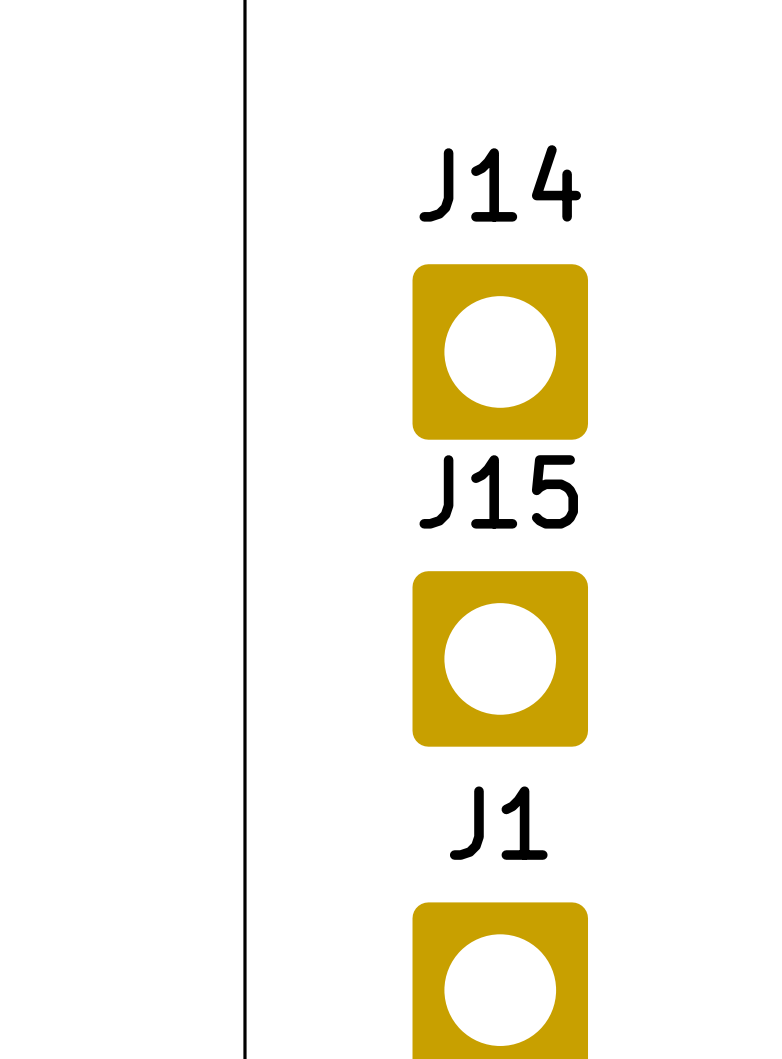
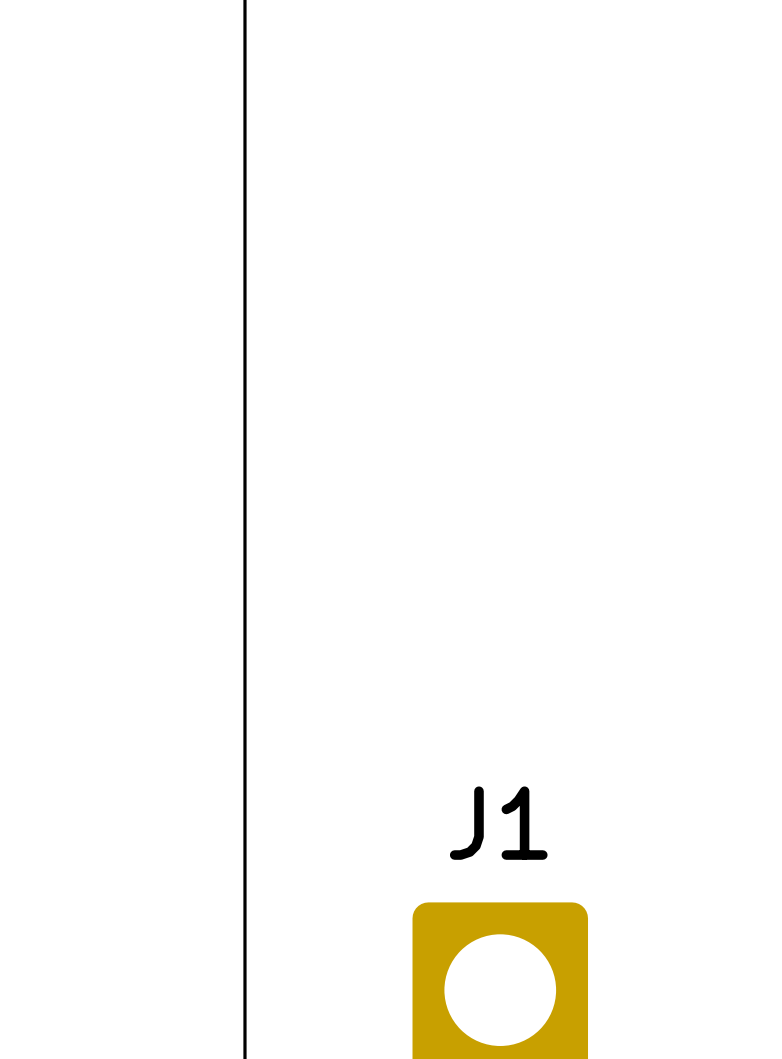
J14: (500, 351) -> none
J15: (500, 658) -> none

